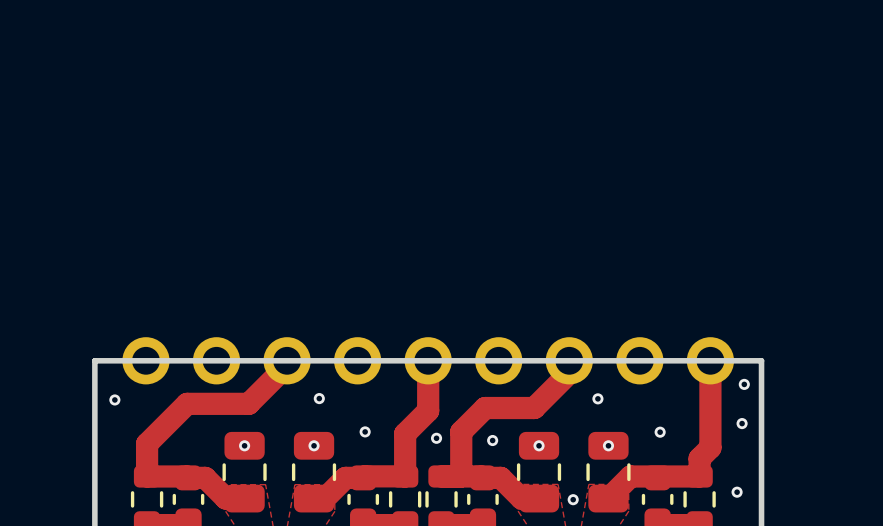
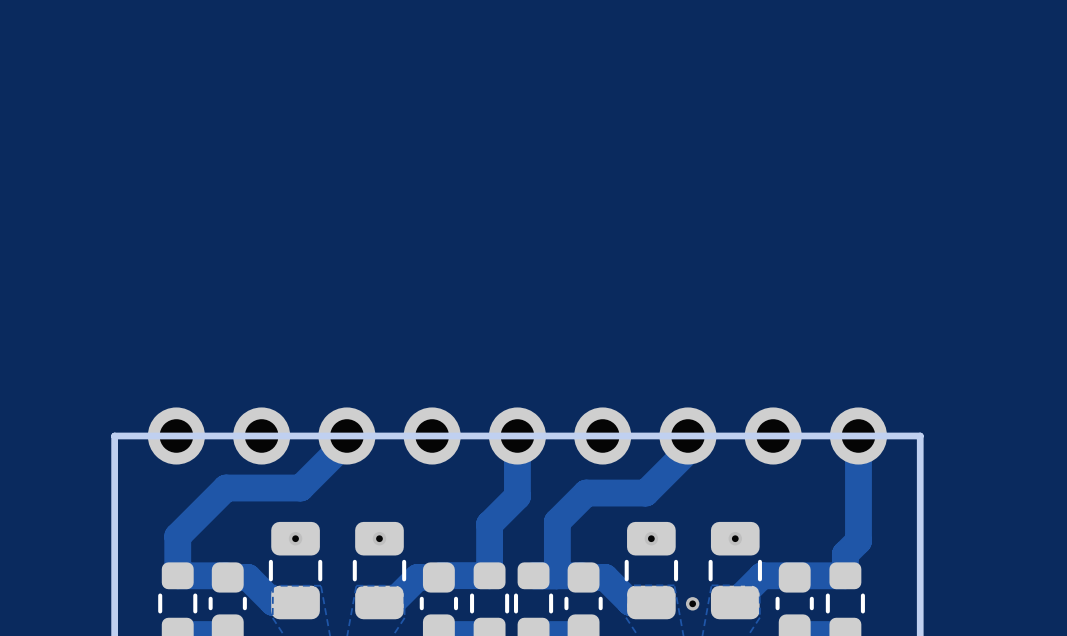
via: (744, 384) -> none
via: (319, 398) -> none
via: (597, 398) -> none
via: (114, 399) -> none
via: (742, 423) -> none
via: (365, 431) -> none
via: (660, 432) -> none
via: (436, 438) -> none
via: (492, 440) -> none
via: (737, 492) -> none

